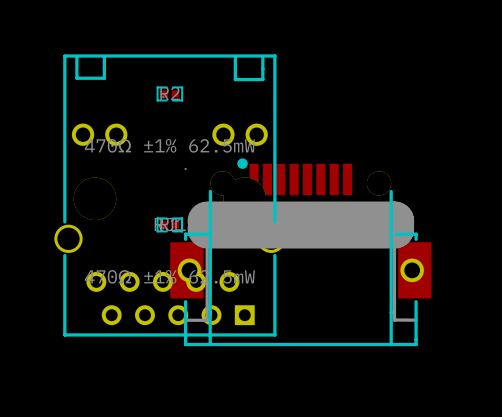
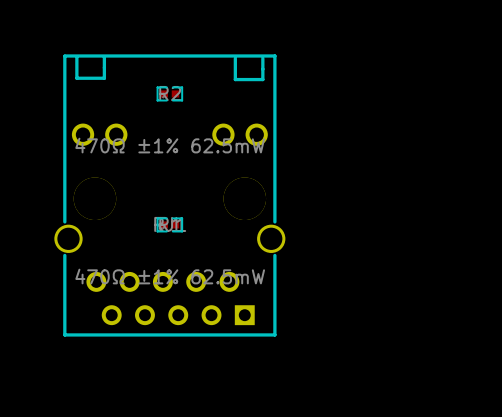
part: (300, 252) -> none

